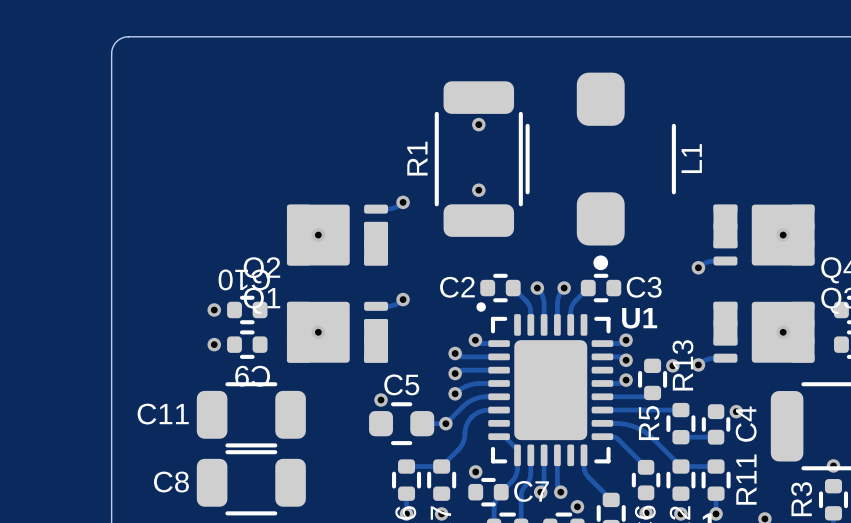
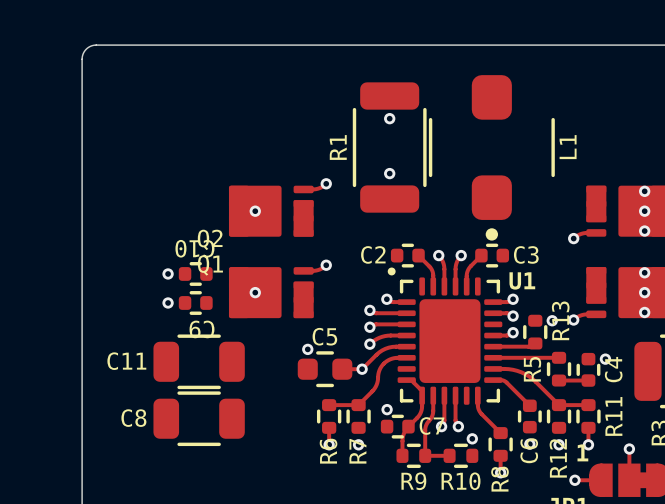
via: none -> (644, 191)
via: none -> (644, 231)
via: none -> (644, 272)
via: none -> (644, 312)

